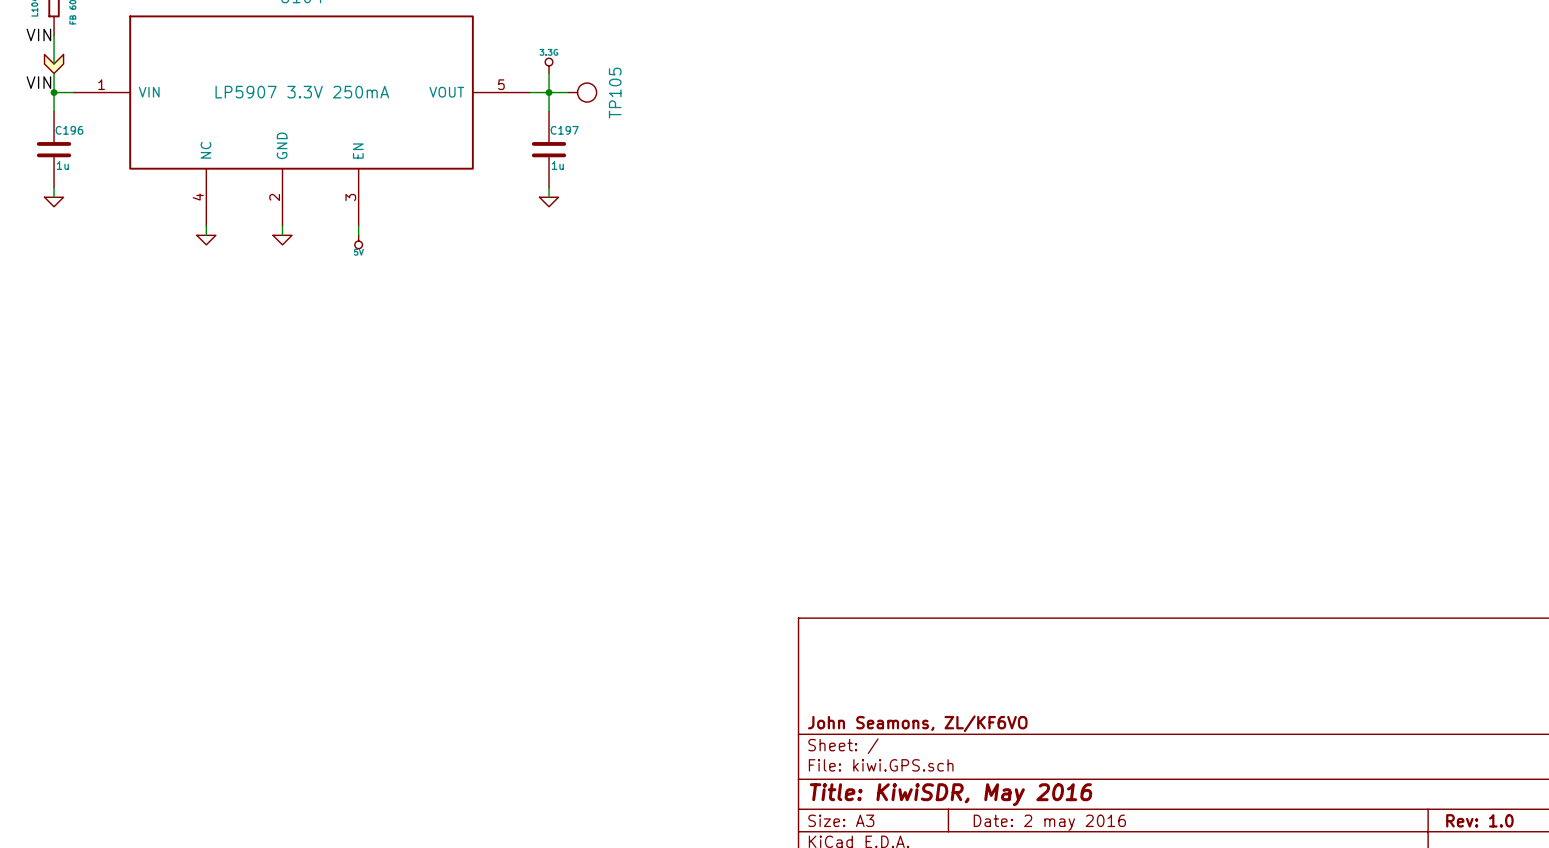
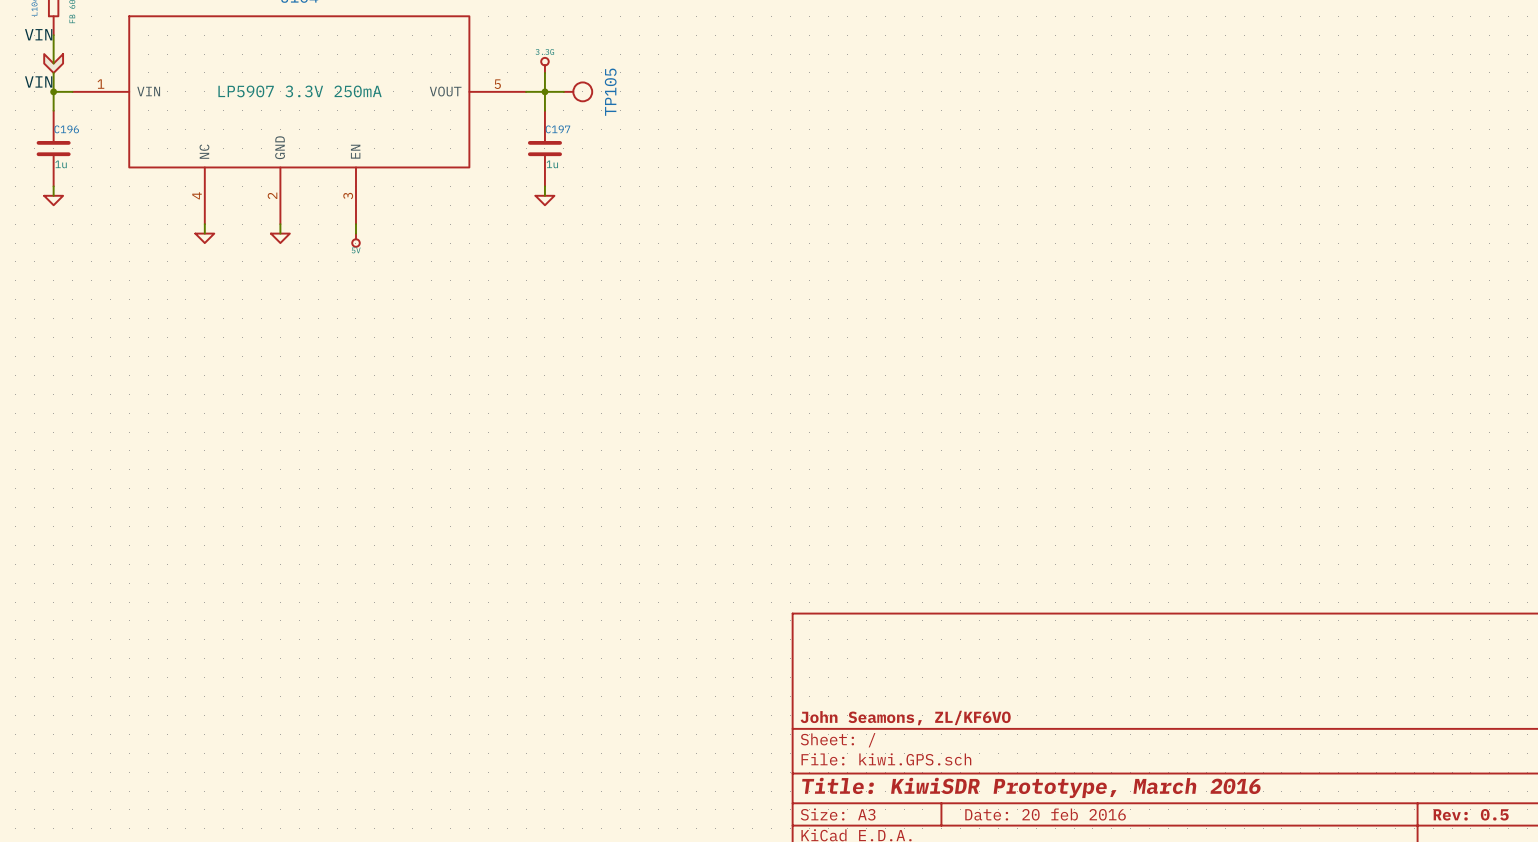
title block: Title: KiwiSDR, May 2016 (951, 794) -> Title: KiwiSDR Prototype, March 2016 (1031, 787)
title block: Rev: 1.0 (1479, 820) -> Rev: 0.5 (1471, 814)
title block: Date: 2 may 2016 (1049, 822) -> Date: 20 feb 2016 (1045, 814)

